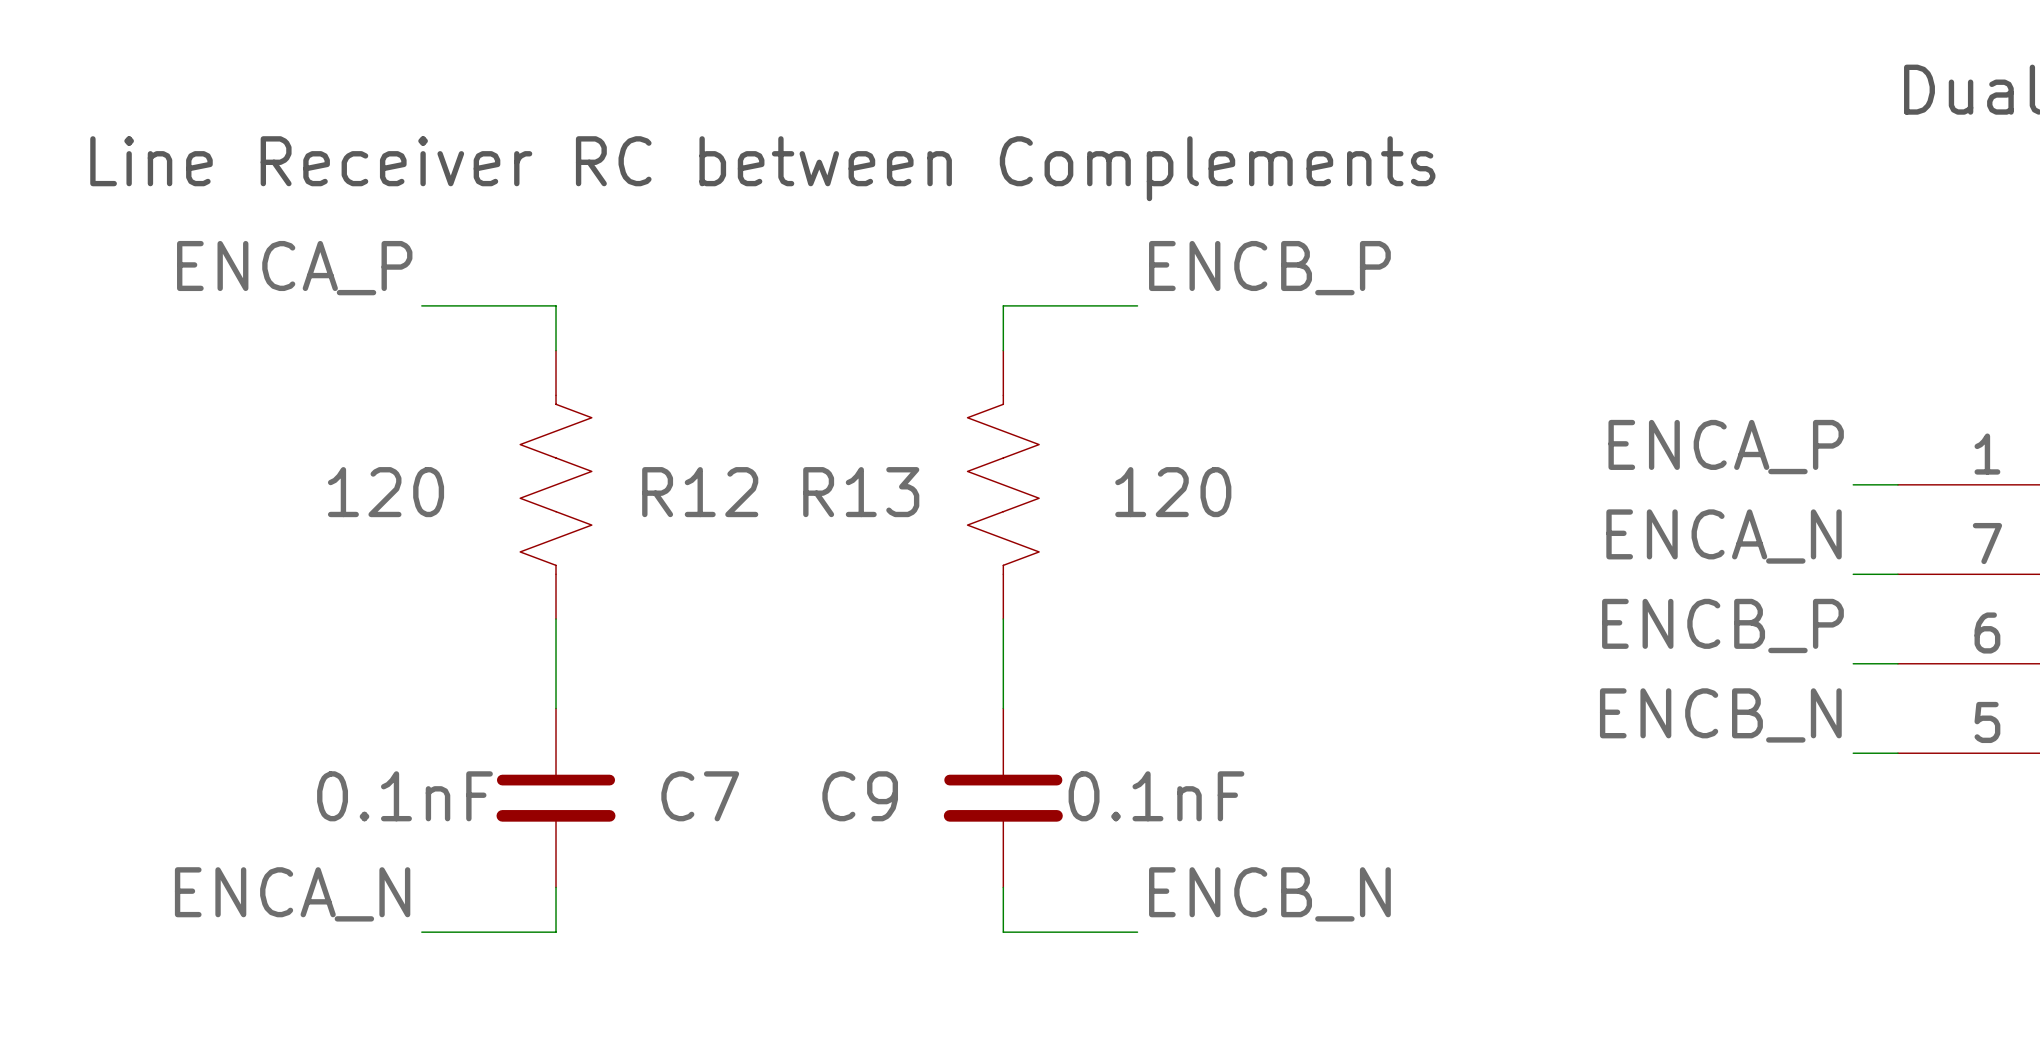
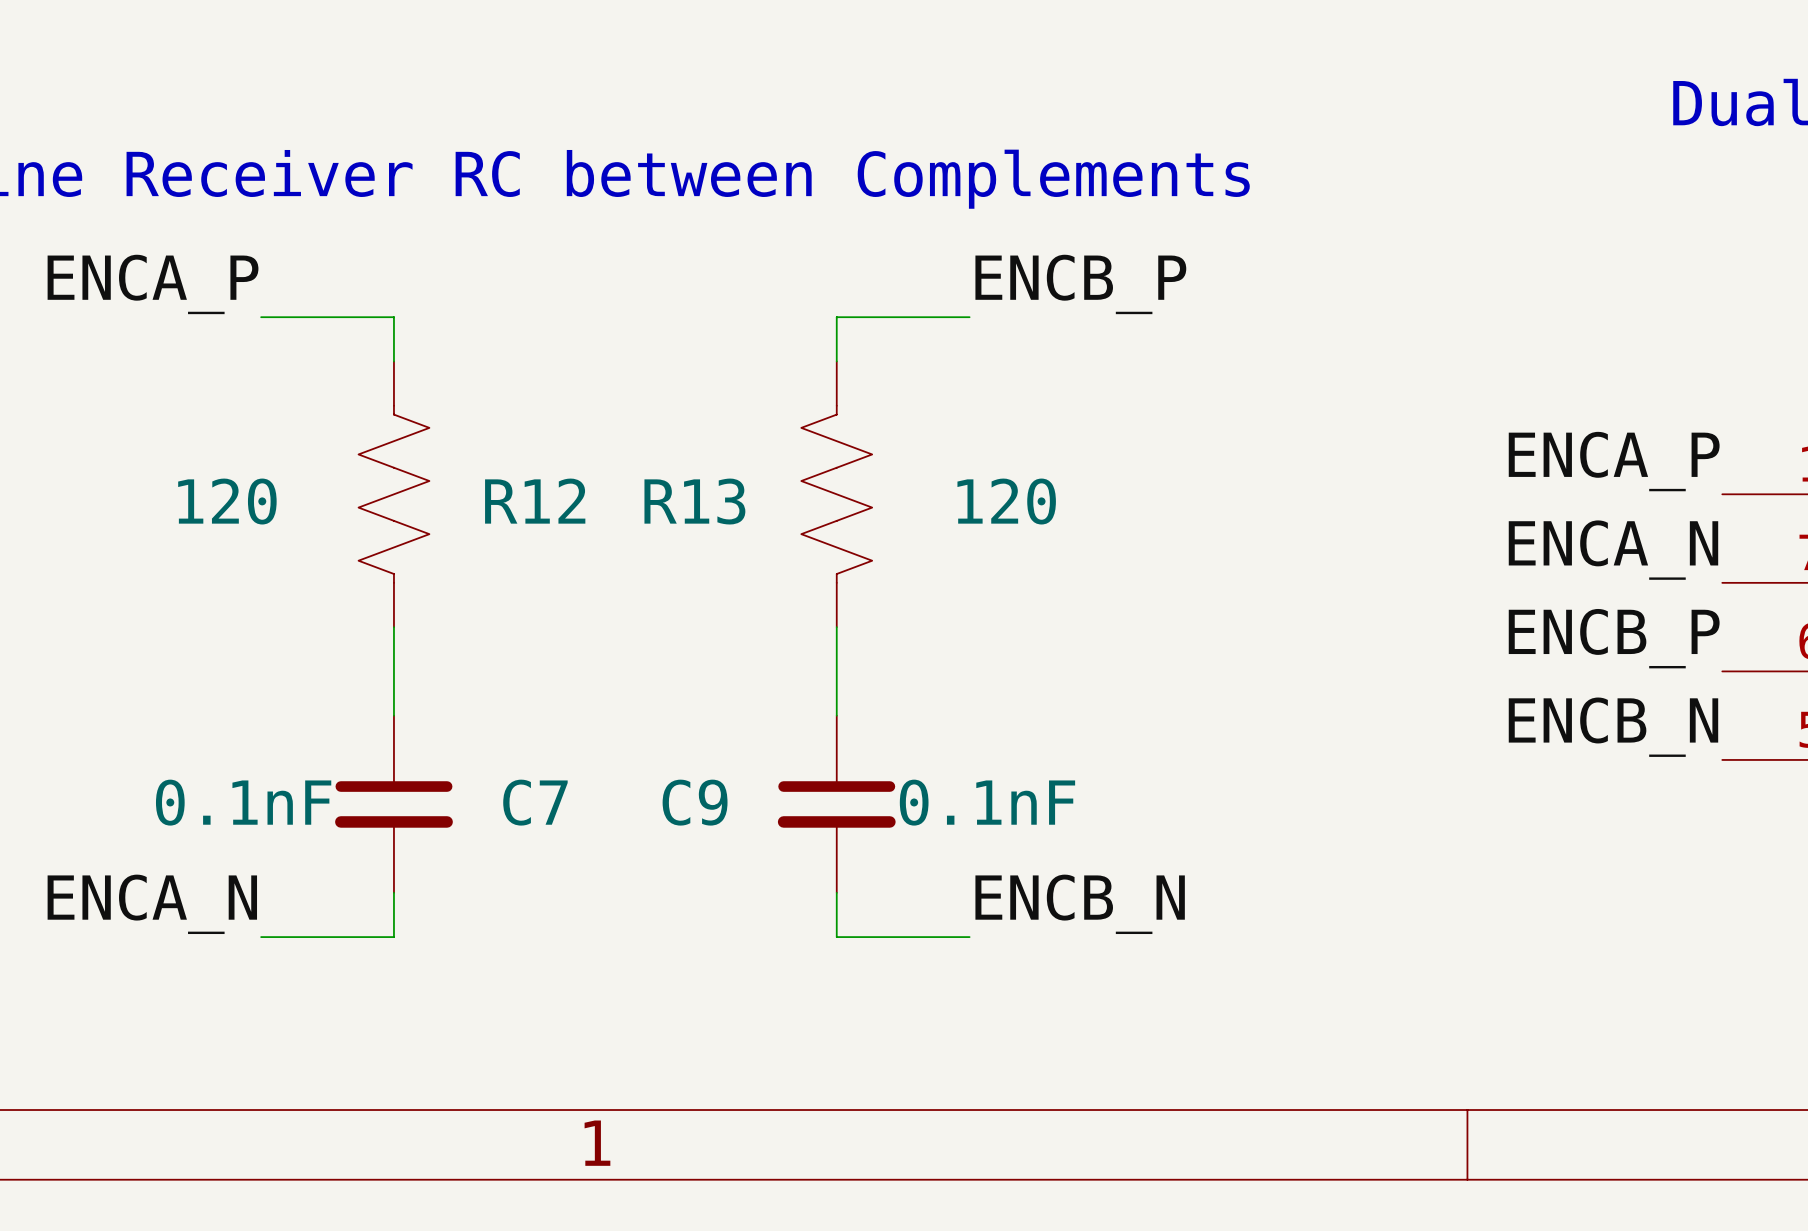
label position: ENCA_P (1726, 447) -> ENCA_P (1614, 461)
wire: (1853, 484) (1897, 484) -> none
label position: ENCA_N (1724, 536) -> ENCA_N (1613, 550)
wire: (1853, 574) (1897, 574) -> none
label position: ENCB_P (1722, 625) -> ENCB_P (1614, 638)
wire: (1853, 663) (1897, 663) -> none
label position: ENCB_N (1720, 715) -> ENCB_N (1613, 727)
wire: (1853, 753) (1897, 753) -> none

